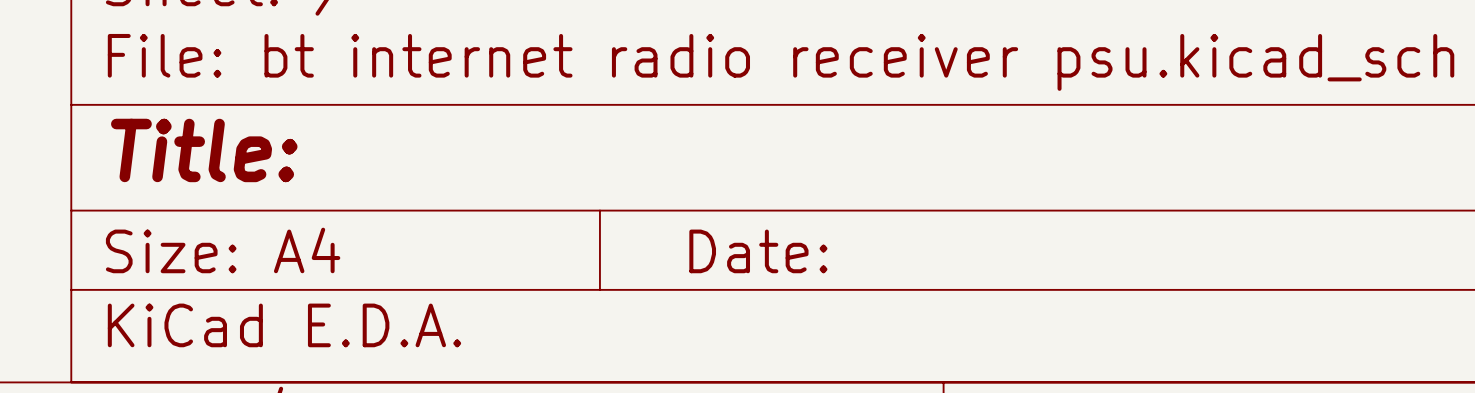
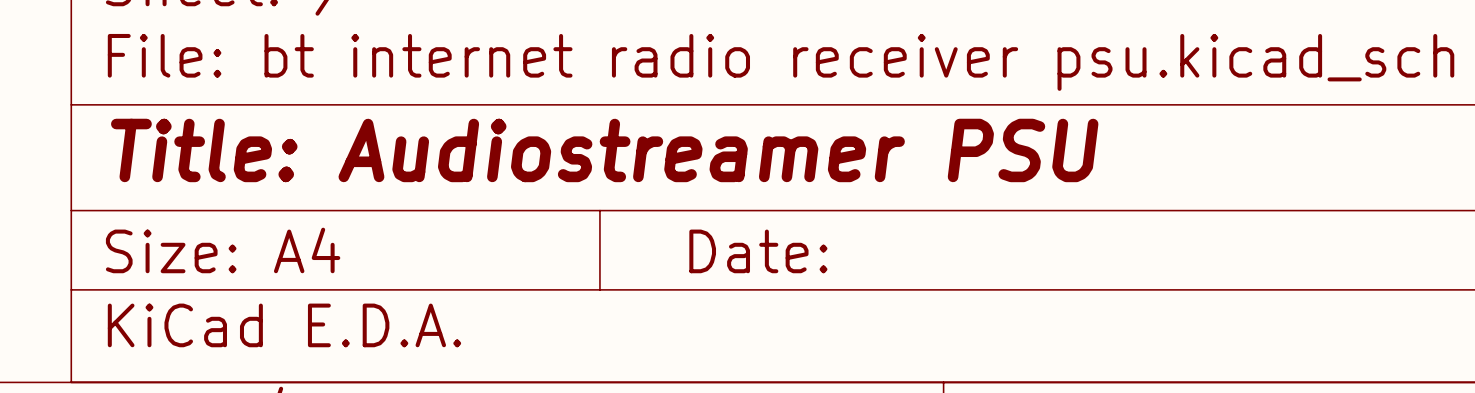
title block: Title: (204, 150) -> Title: Audiostreamer PSU (604, 150)

